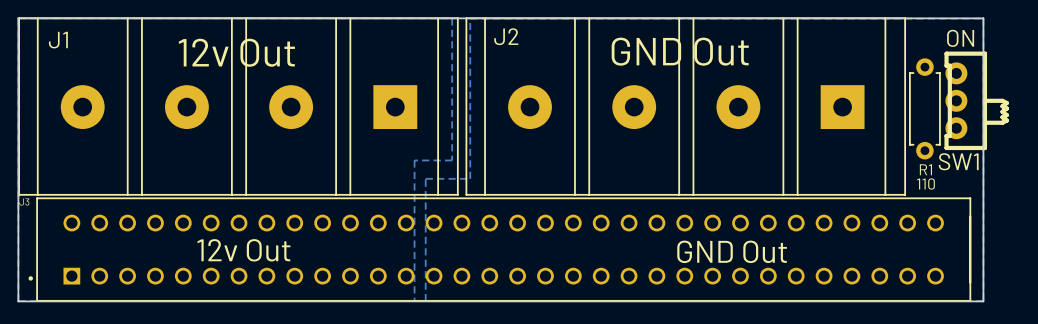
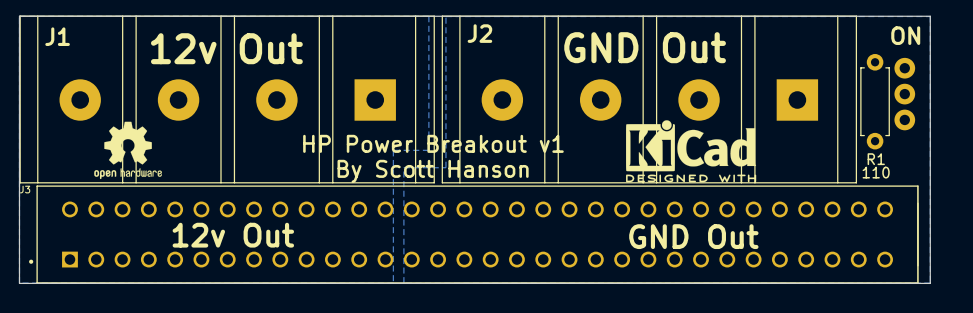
text: none -> ON (905, 35)
SW1 side: bottom (976, 100) -> top (904, 94)
drawing: none -> [625, 120, 757, 183]
drawing: none -> [94, 121, 162, 180]
text: none -> HP Power Breakout v1 (433, 143)
text: none -> By Scott Hanson (433, 171)

